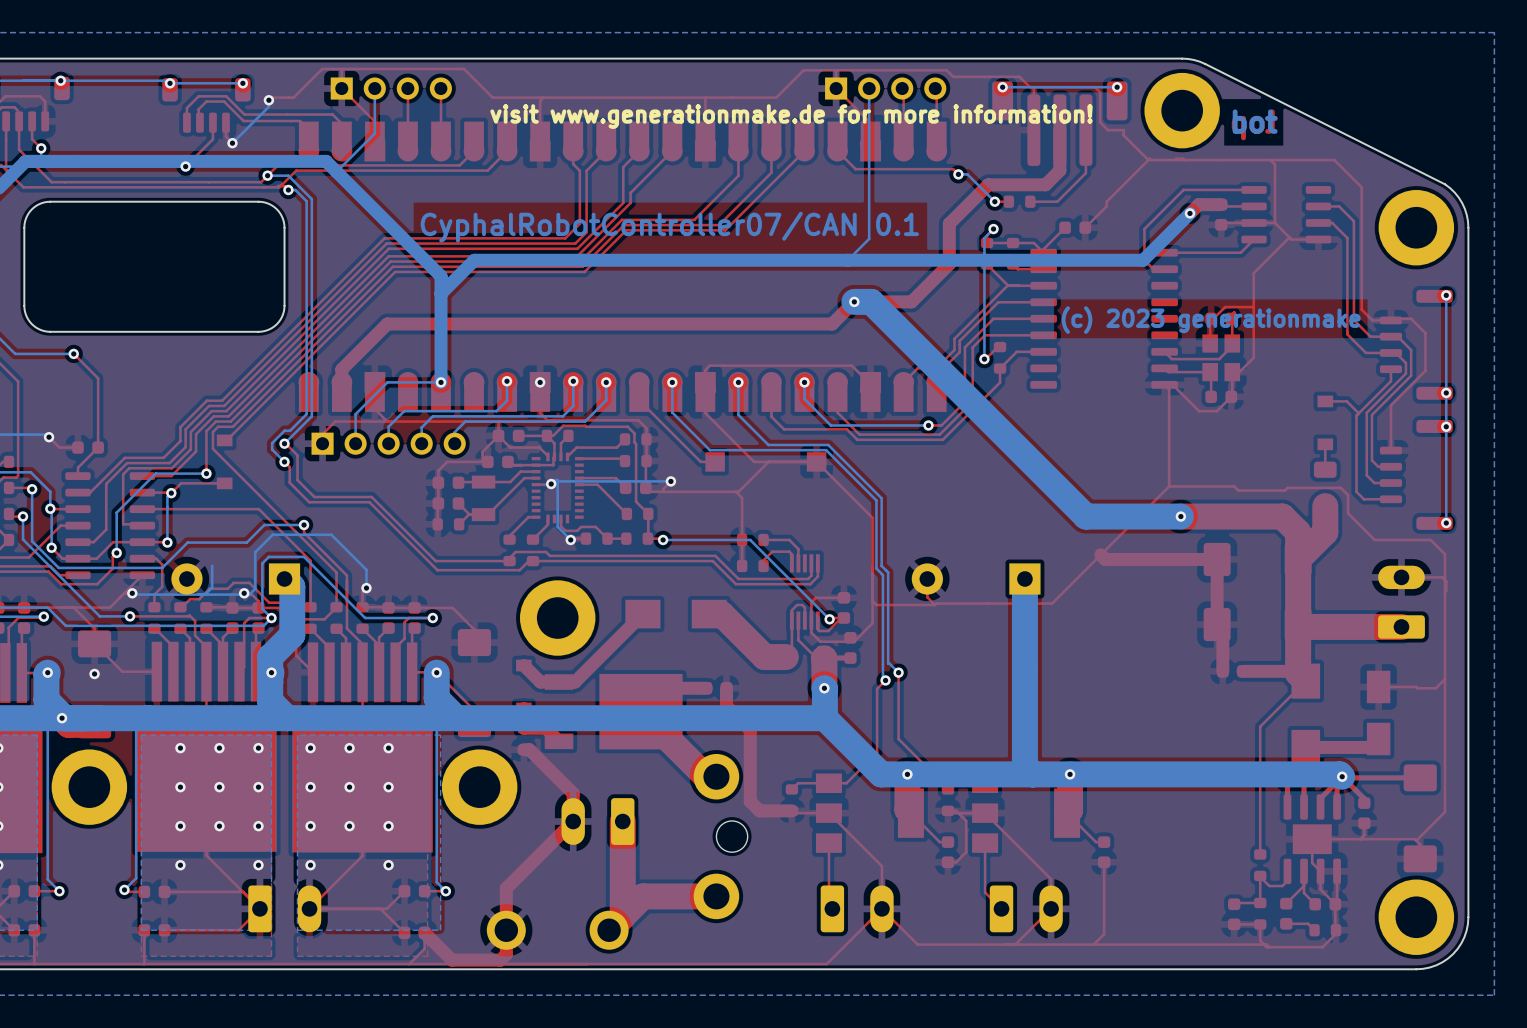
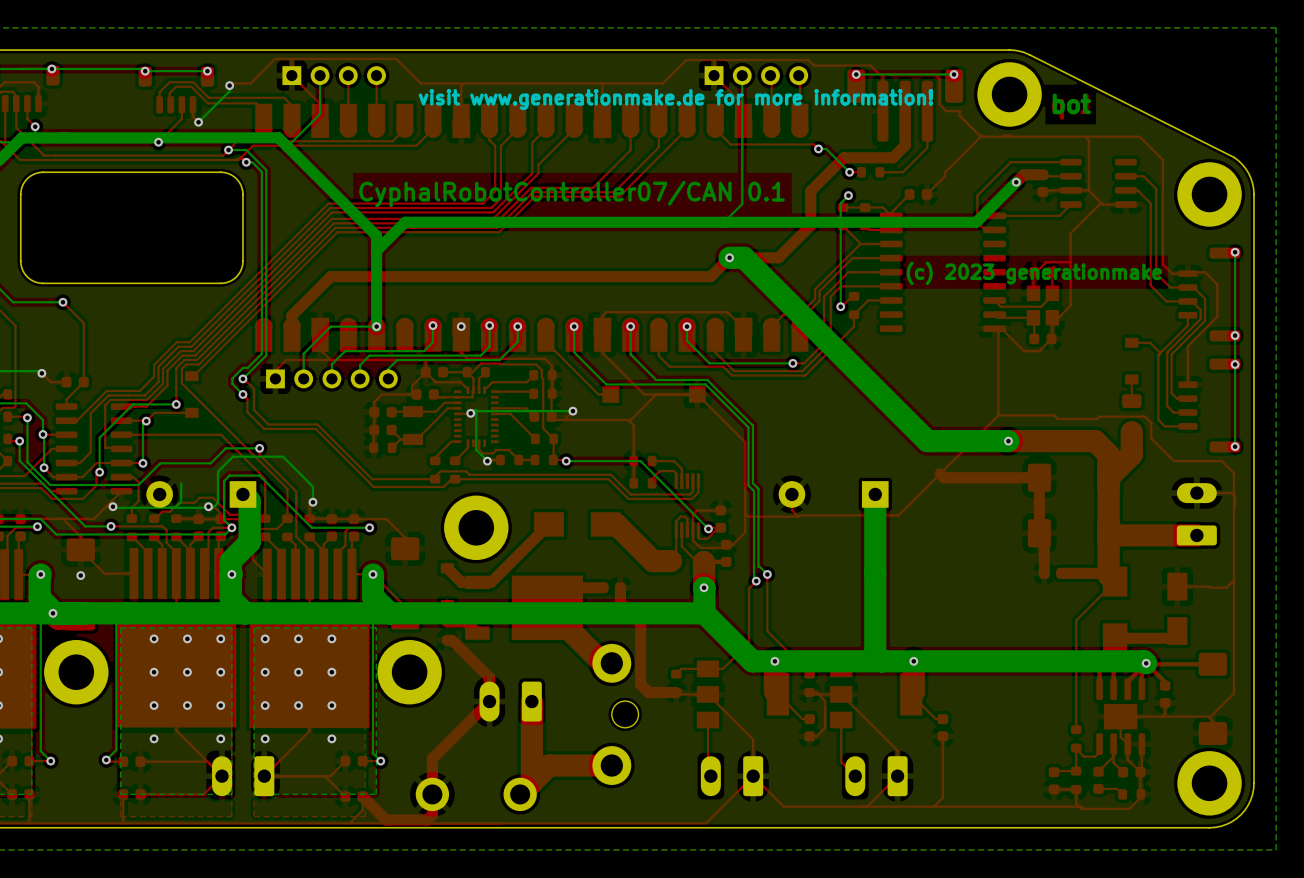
part rotation: 0° (284, 908) -> 180° (243, 776)
part rotation: 0° (857, 908) -> 180° (732, 776)
part rotation: 0° (1026, 908) -> 180° (876, 776)

